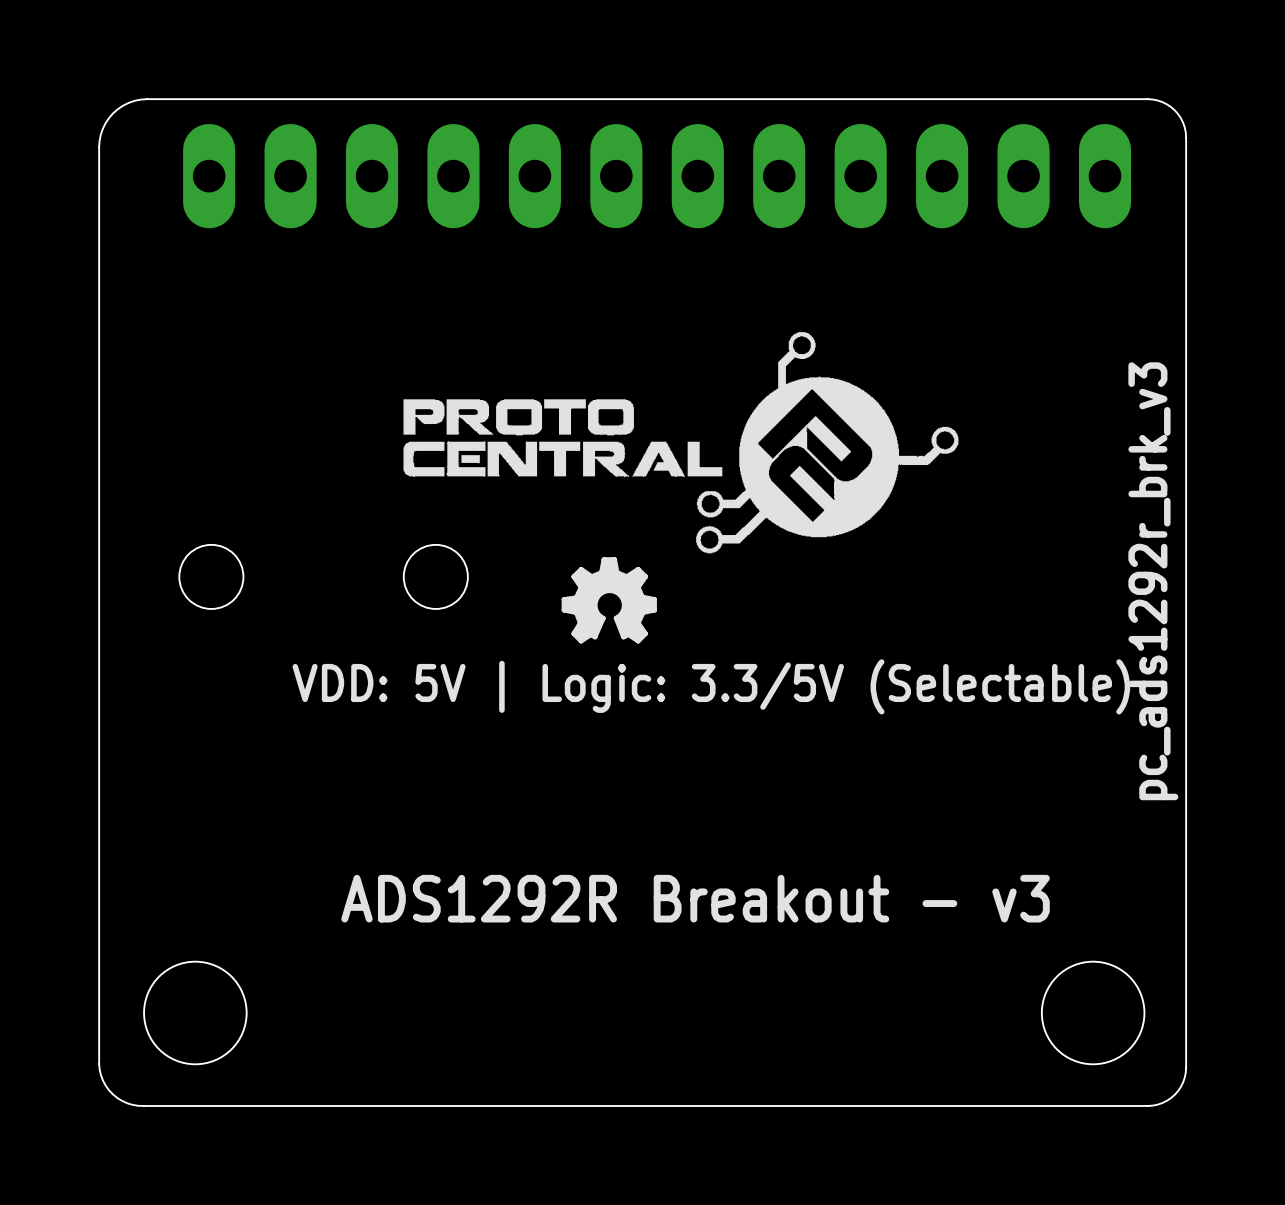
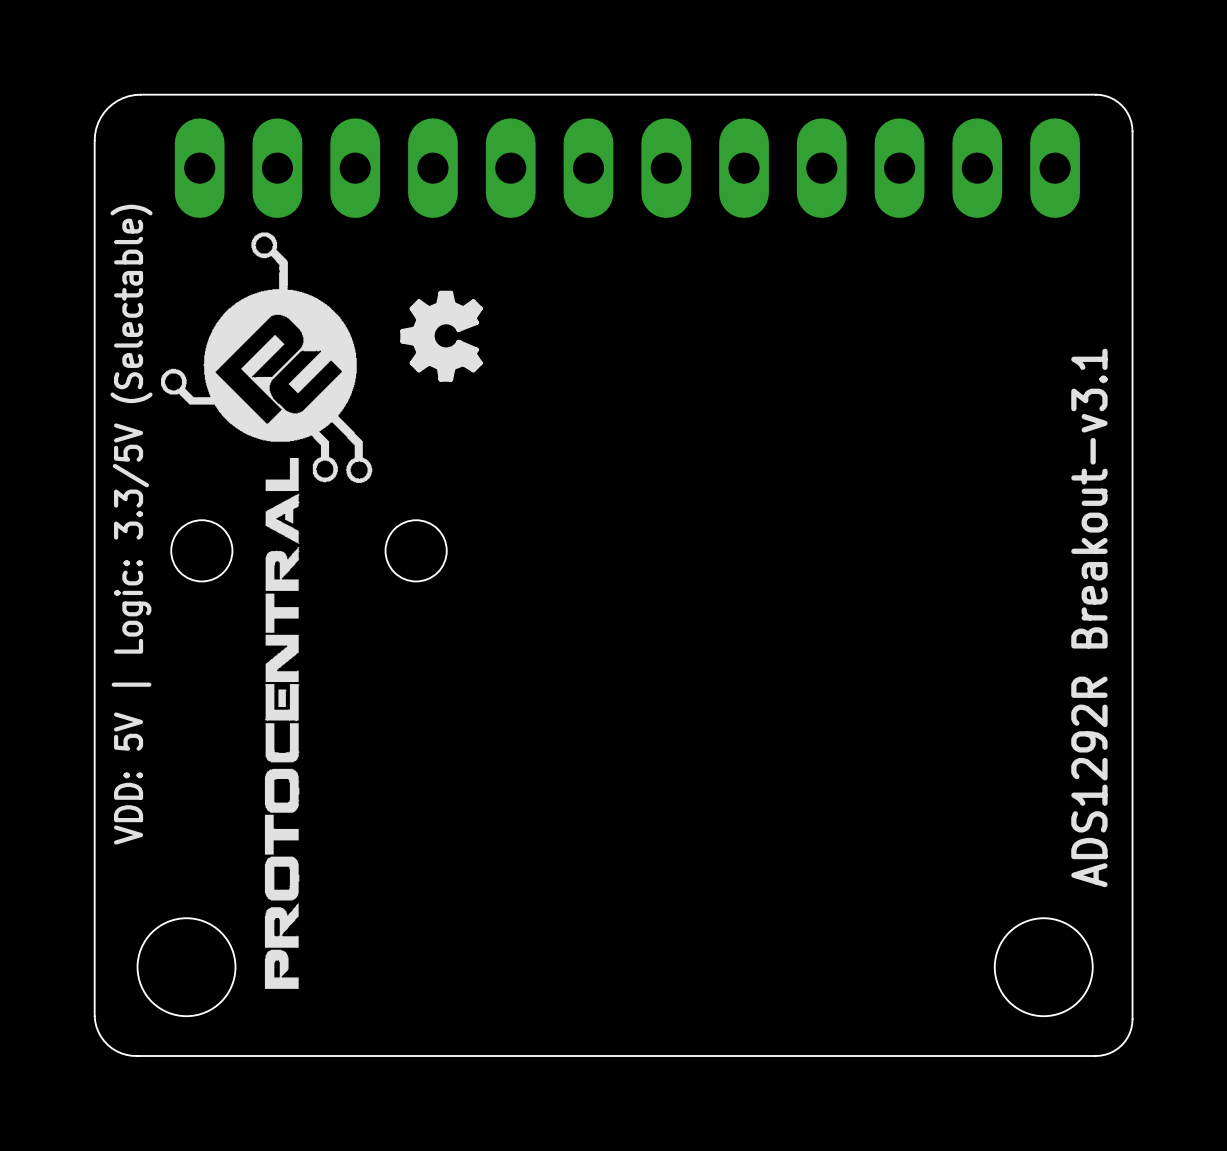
drawing: none -> [161, 232, 483, 989]
drawing: [403, 332, 959, 644] -> none
text: none -> VDD: 5V | Logic: 3.3/5V (Selectable) (131, 524)
text: pc_ads1292r_brk_v3 (1153, 581) -> none
text: none -> ADS1292R Breakout-v3.1 (1089, 617)
text: VDD: 5V | Logic: 3.3/5V (Selectable) (711, 686) -> none
text: ADS1292R Breakout - v3 (695, 898) -> none

